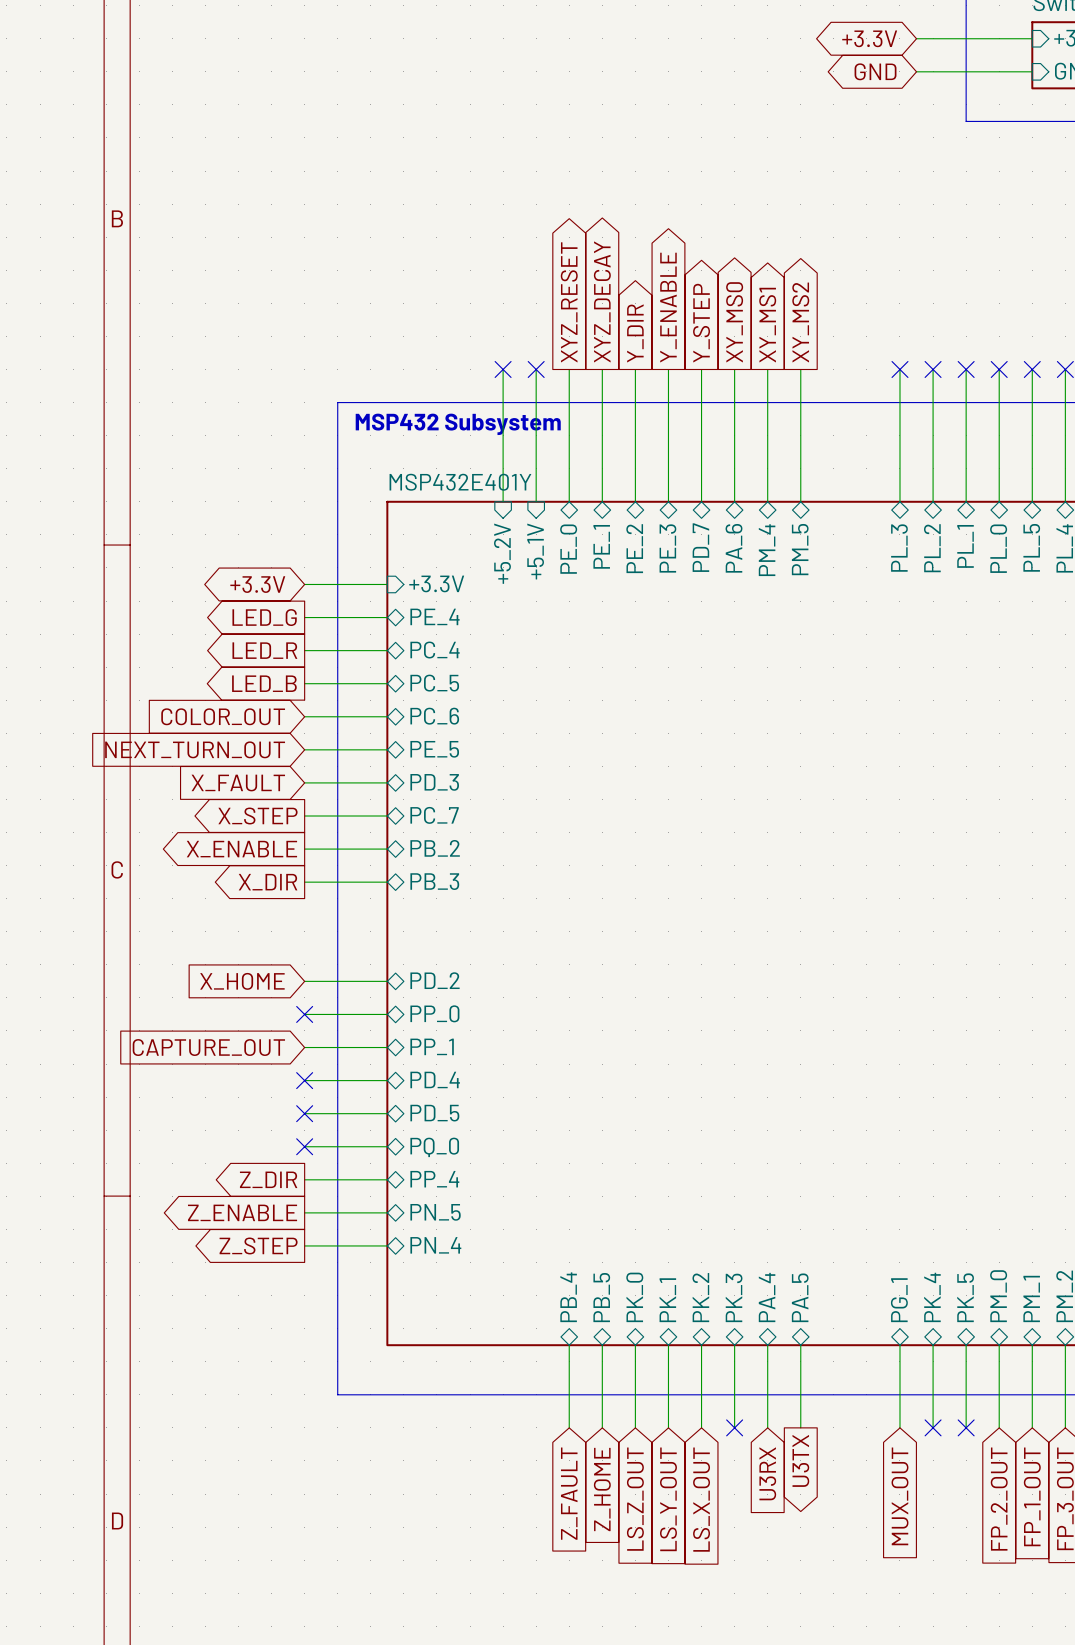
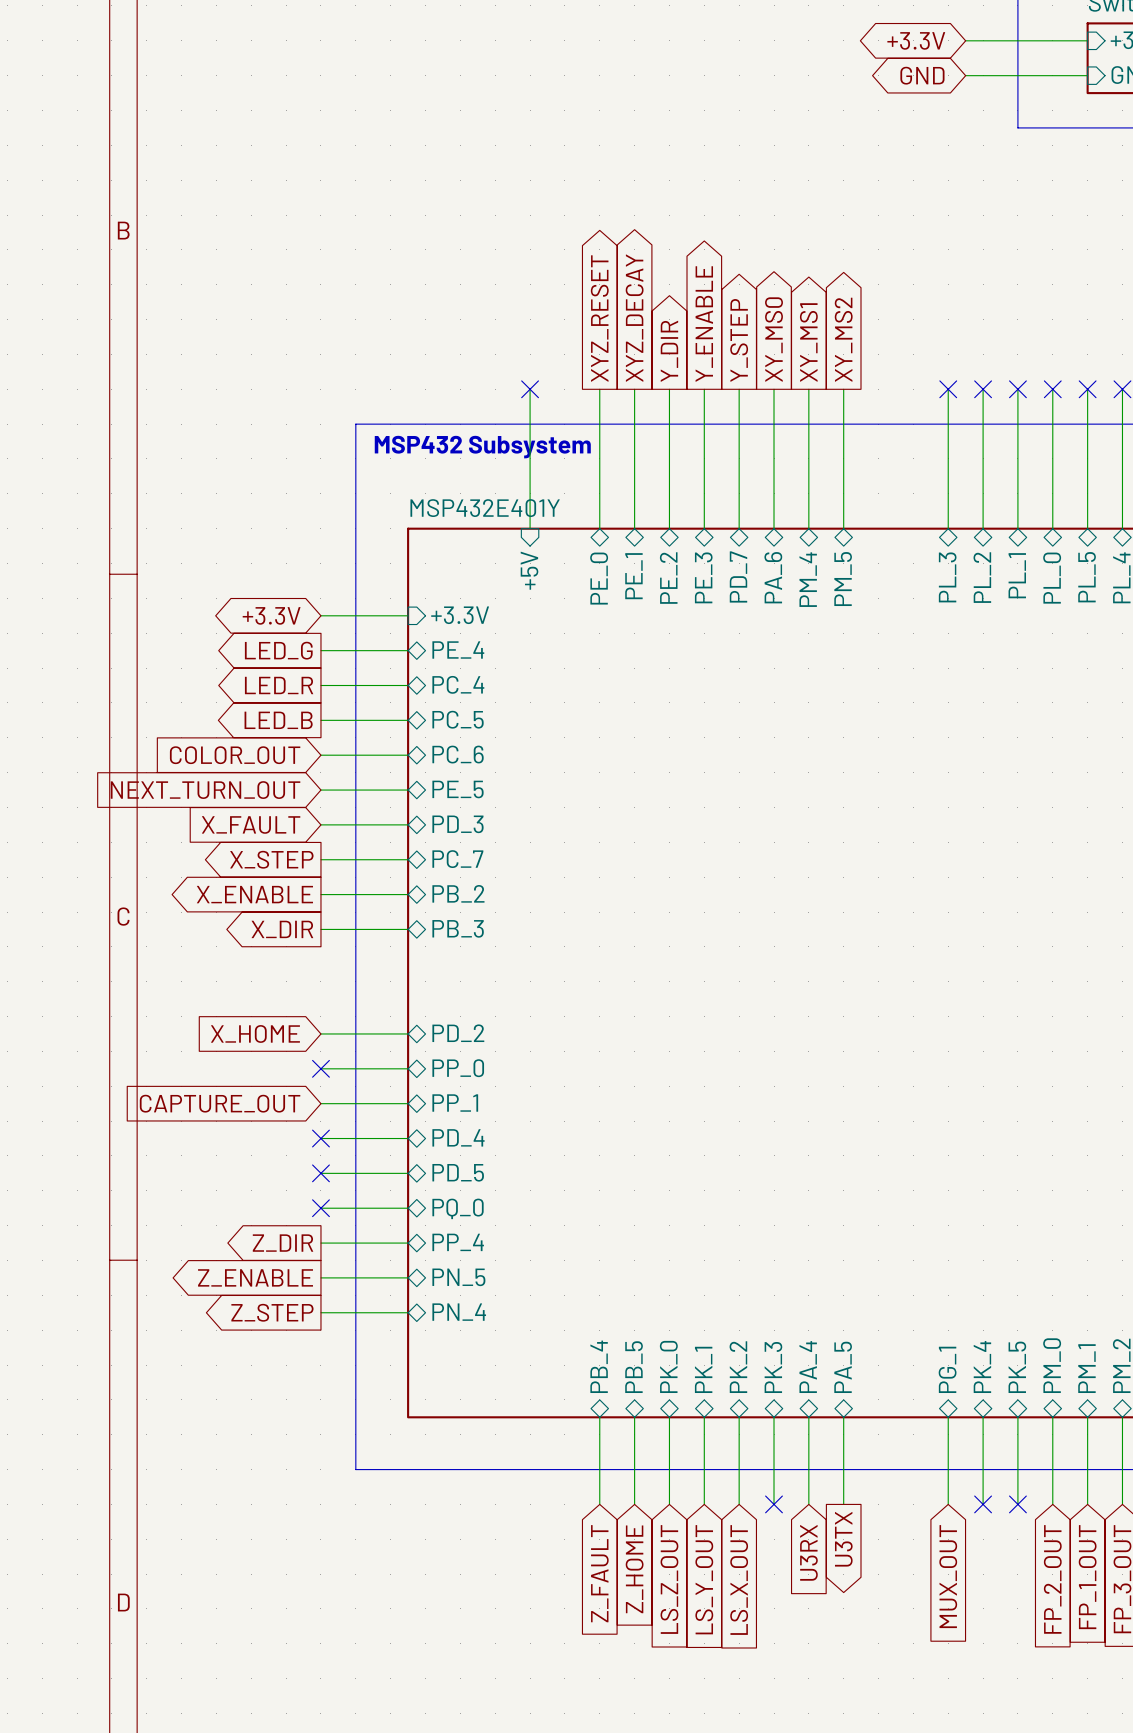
wire: (536, 369) (536, 501) -> none
no-connect mark: (536, 369) -> none
sheet pin: +5_1V (535, 551) -> none
sheet pin: +5_2V (502, 553) -> +5V (529, 570)

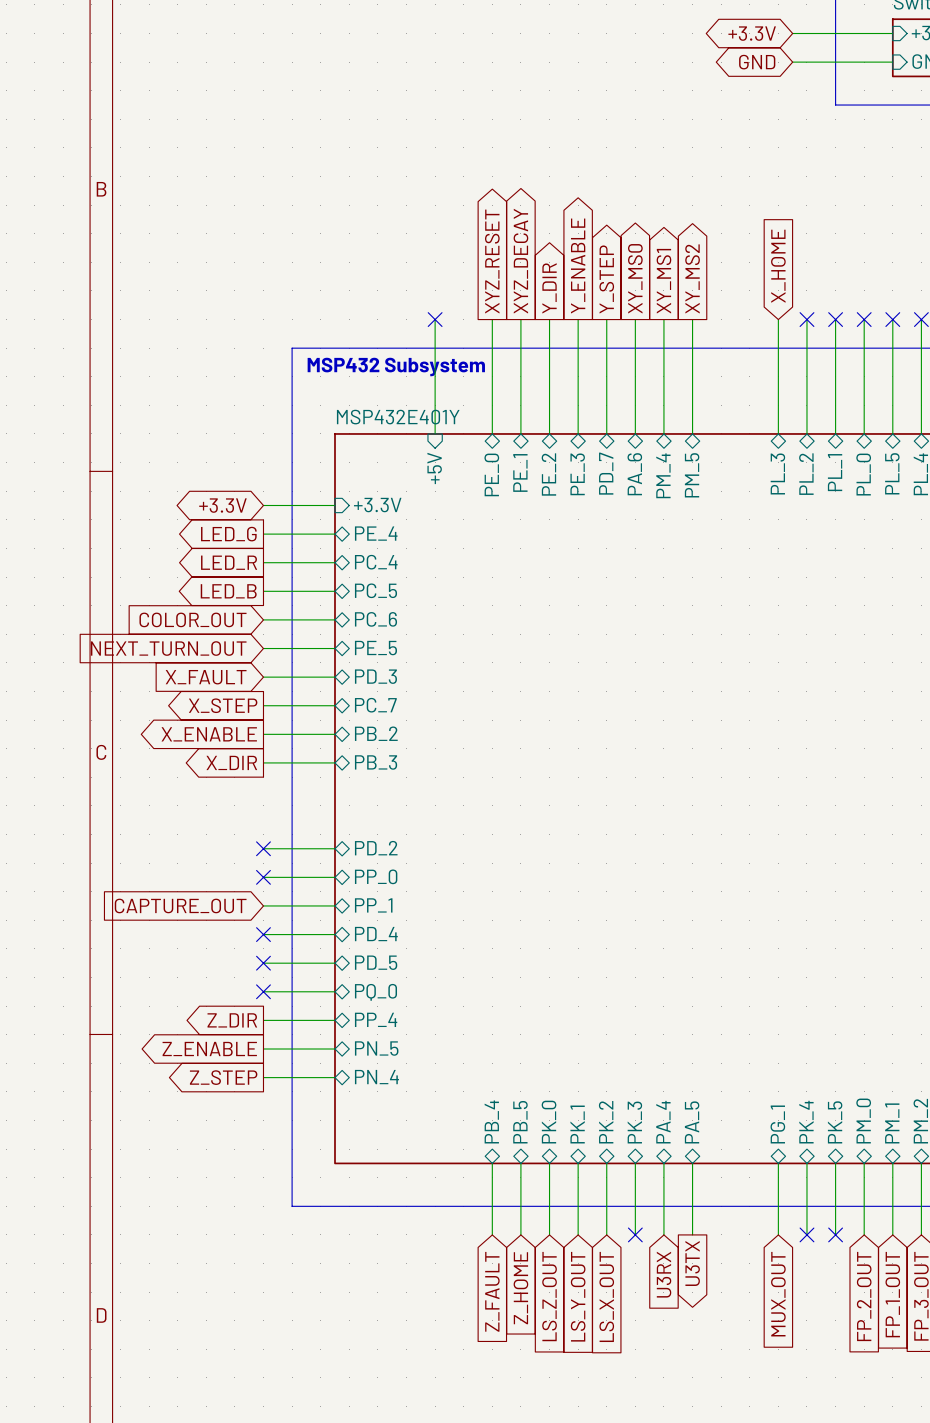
global label: none -> X_HOME (778, 266)
no-connect mark: (948, 389) -> none
global label: X_HOME (255, 1033) -> none
no-connect mark: none -> (263, 848)

